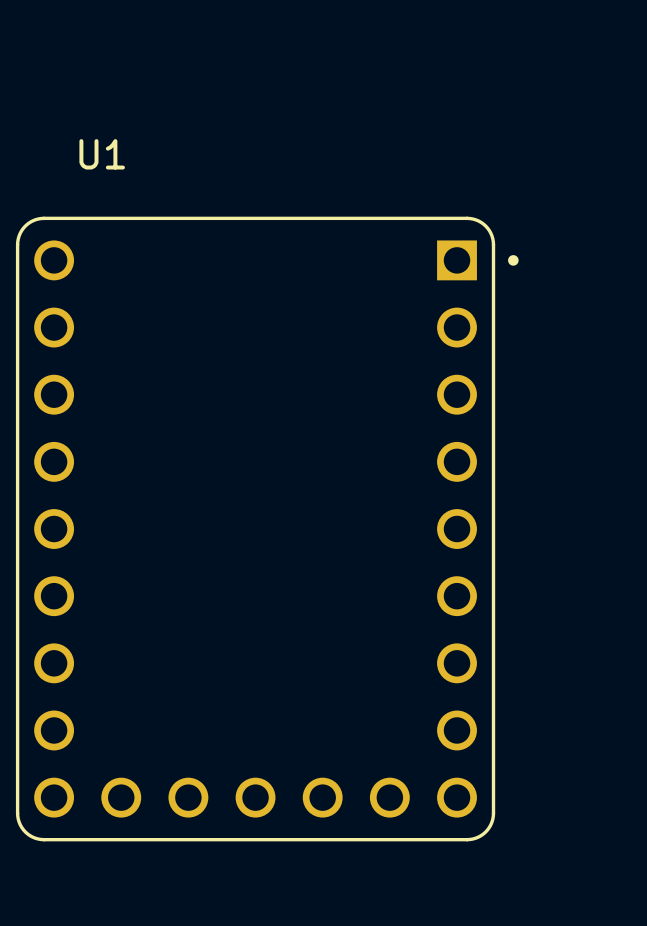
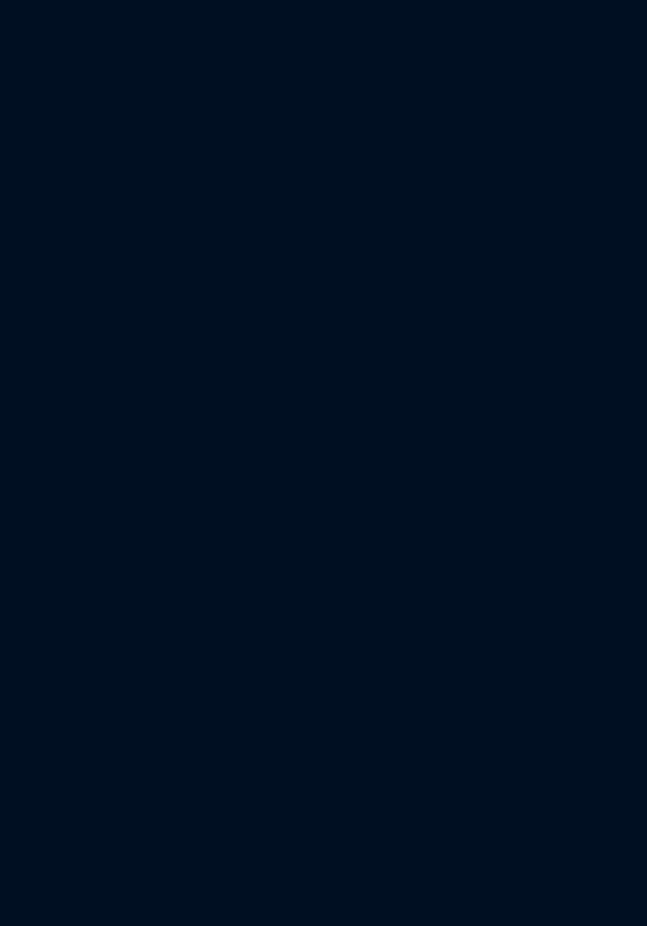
U1: (267, 529) -> none

